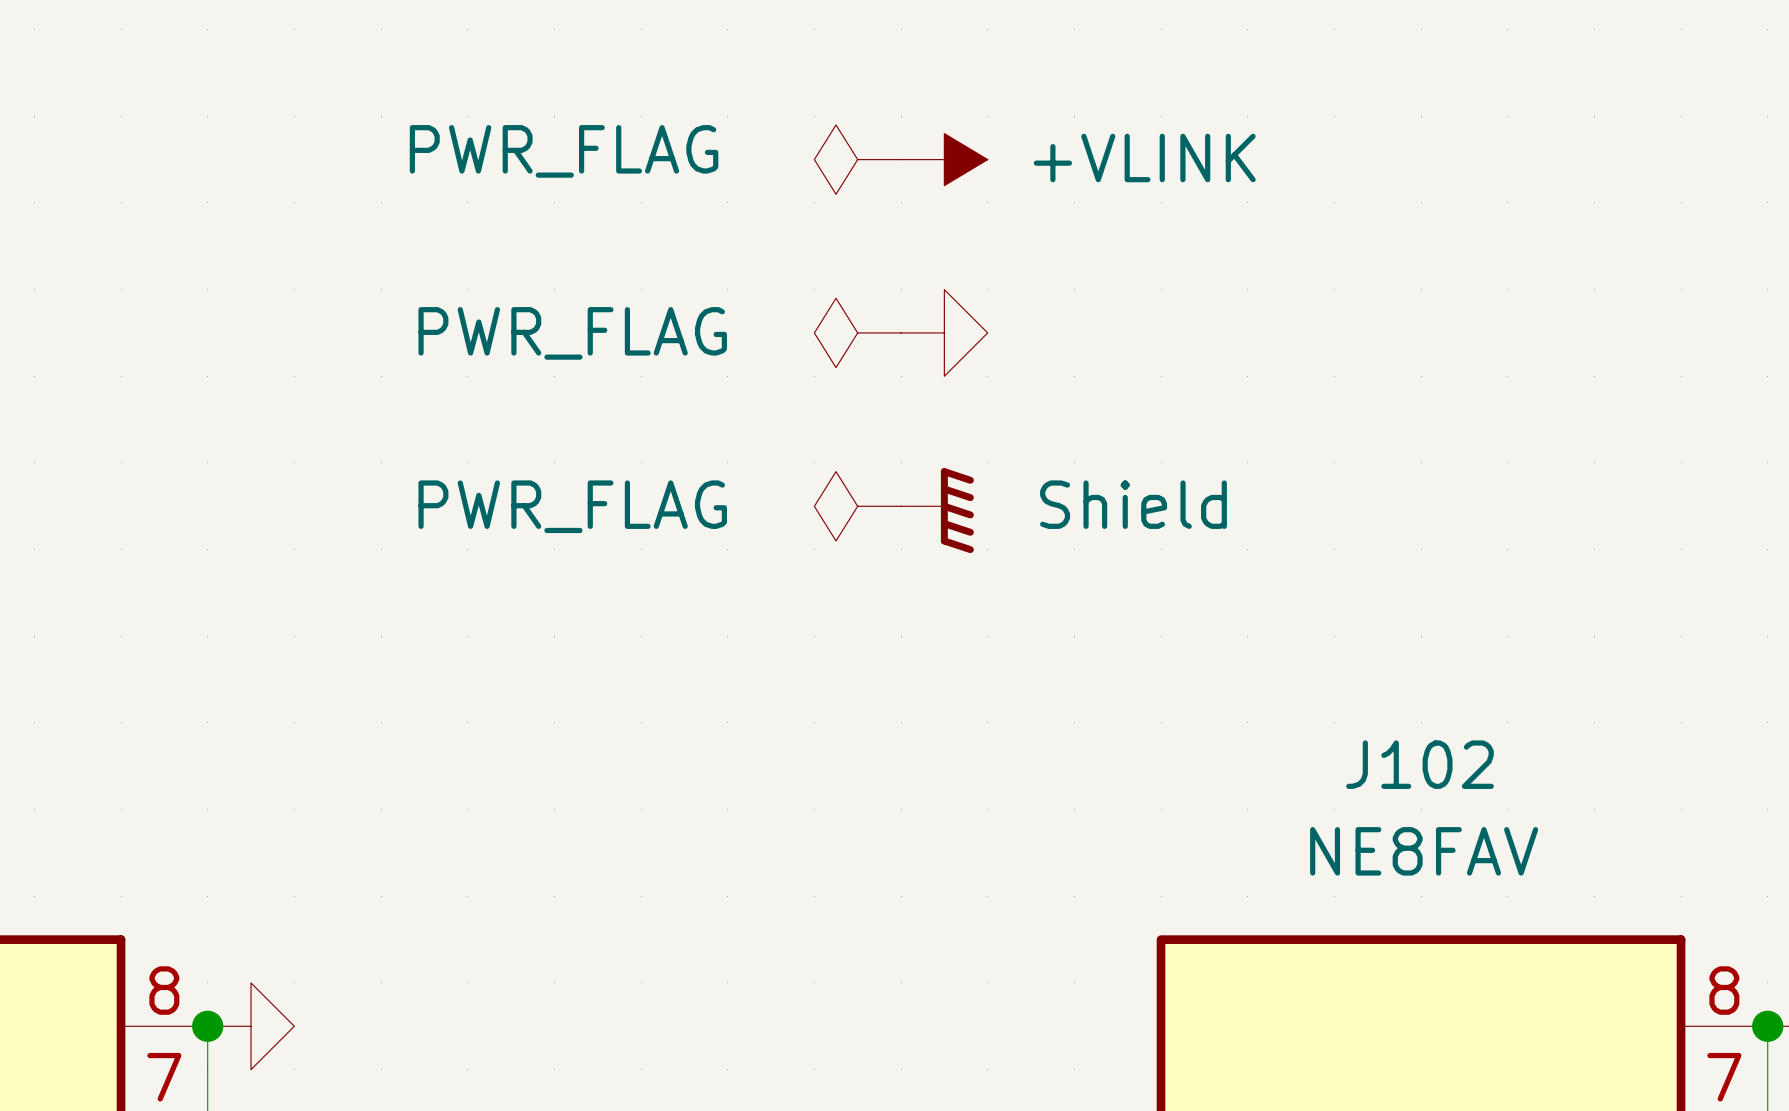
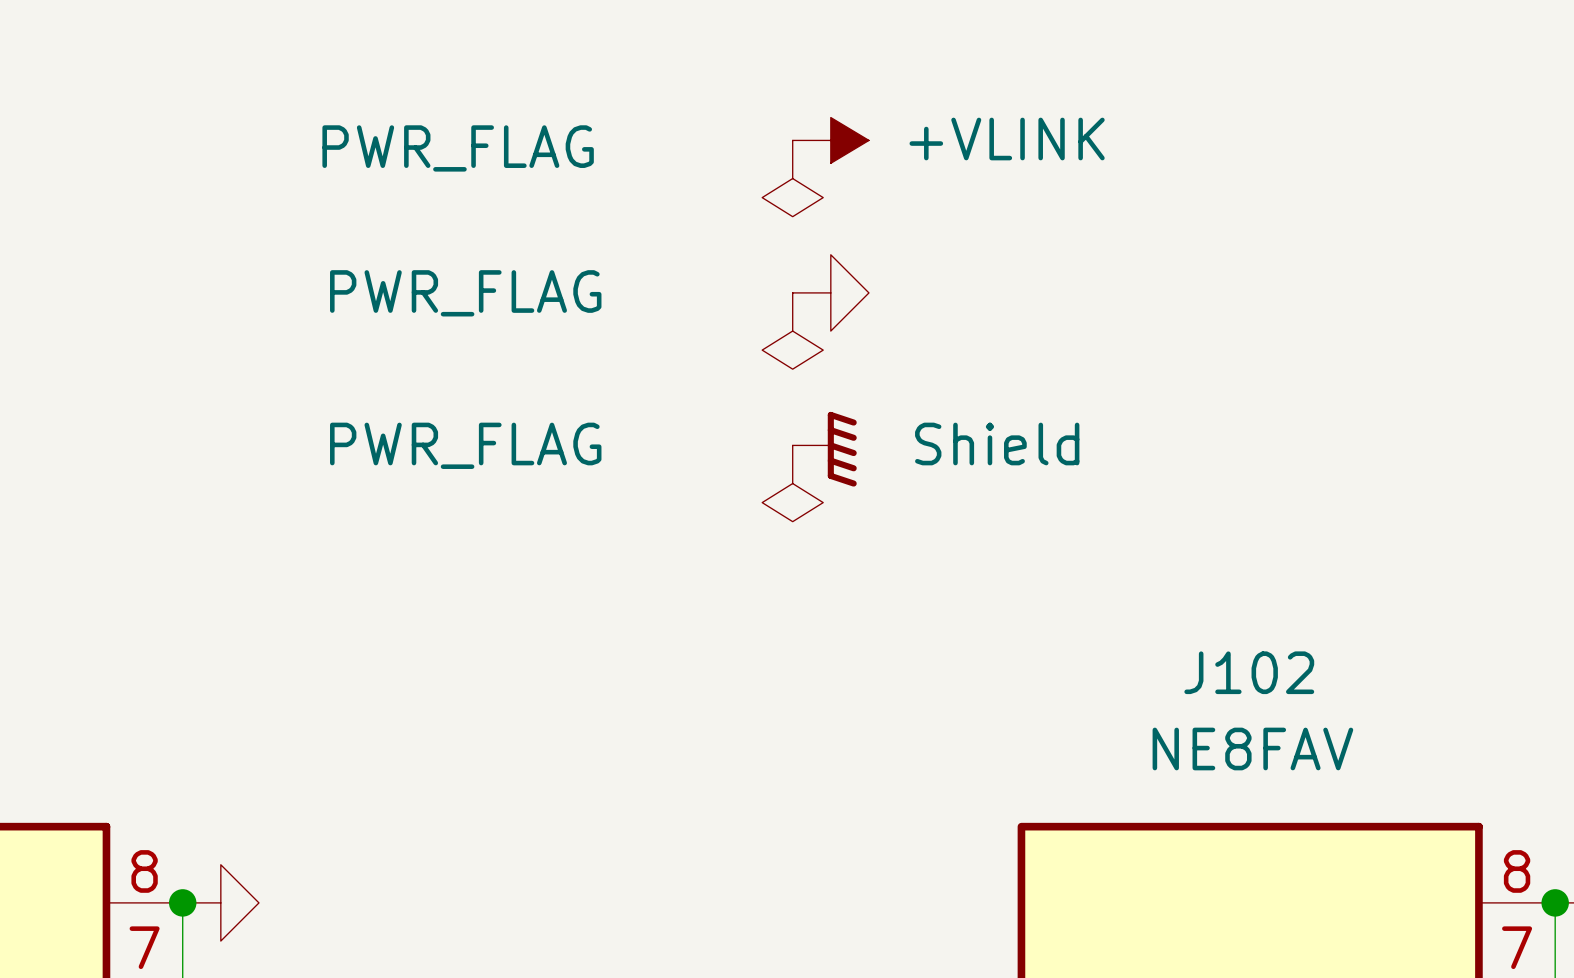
power symbol text position: PWR_FLAG (564, 151) -> PWR_FLAG (458, 148)
power symbol rotation: 0° (857, 159) -> 90° counterclockwise (792, 178)
power symbol position: PWR_FLAG (857, 159) -> PWR_FLAG (792, 178)
power symbol rotation: 0° (857, 332) -> 90° counterclockwise (792, 331)
power symbol position: PWR_FLAG (857, 332) -> PWR_FLAG (792, 331)
power symbol text position: PWR_FLAG (572, 333) -> PWR_FLAG (465, 293)
power symbol text position: PWR_FLAG (572, 506) -> PWR_FLAG (465, 445)
power symbol rotation: 0° (857, 506) -> 90° counterclockwise (792, 483)
power symbol position: PWR_FLAG (857, 506) -> PWR_FLAG (792, 483)

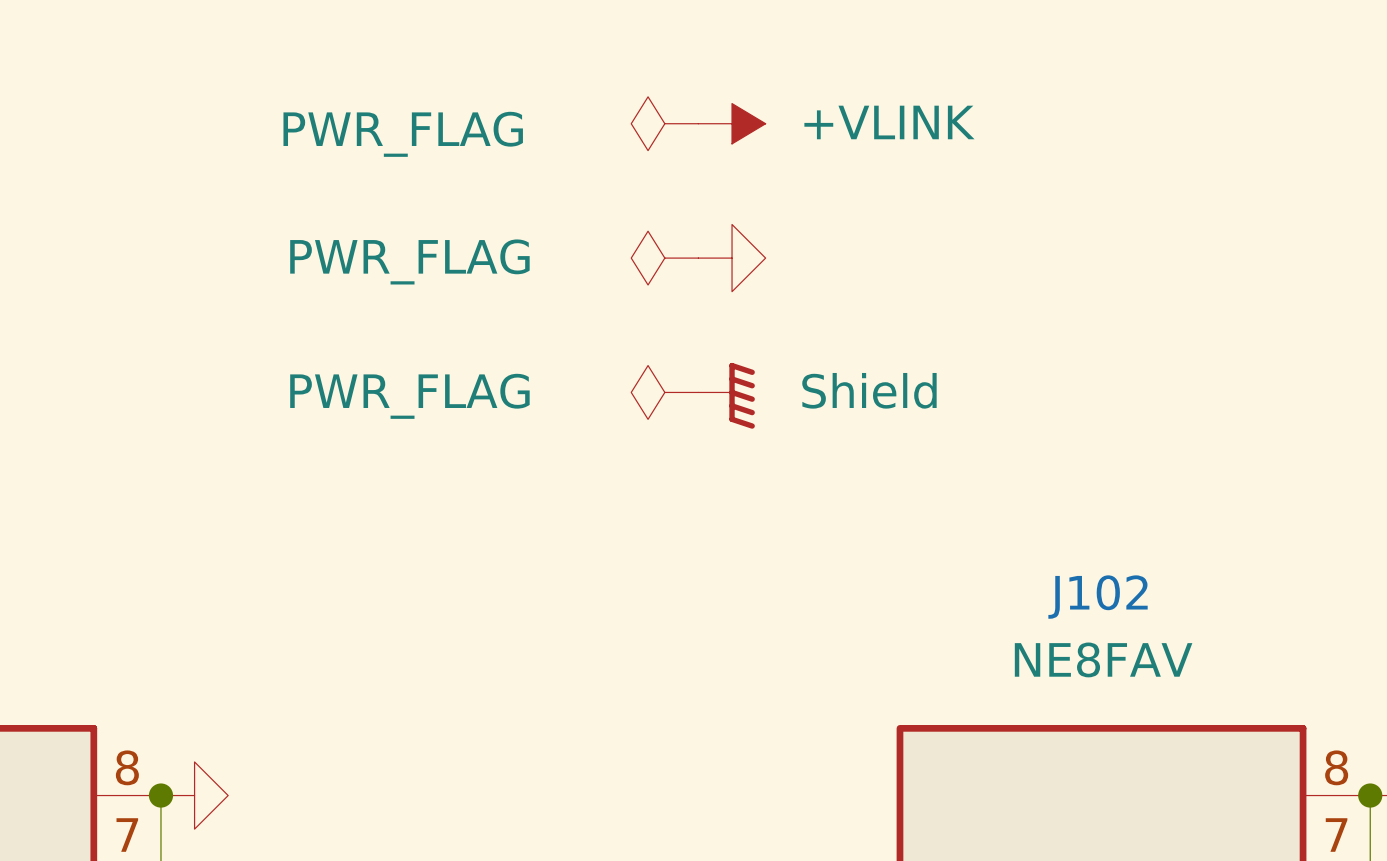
power symbol rotation: 0° (792, 178) -> 90° clockwise (664, 123)
power symbol position: PWR_FLAG (792, 178) -> PWR_FLAG (664, 123)
power symbol rotation: 0° (792, 331) -> 90° clockwise (664, 258)
power symbol position: PWR_FLAG (792, 331) -> PWR_FLAG (664, 258)
power symbol rotation: 0° (792, 483) -> 90° clockwise (664, 392)
power symbol position: PWR_FLAG (792, 483) -> PWR_FLAG (664, 392)

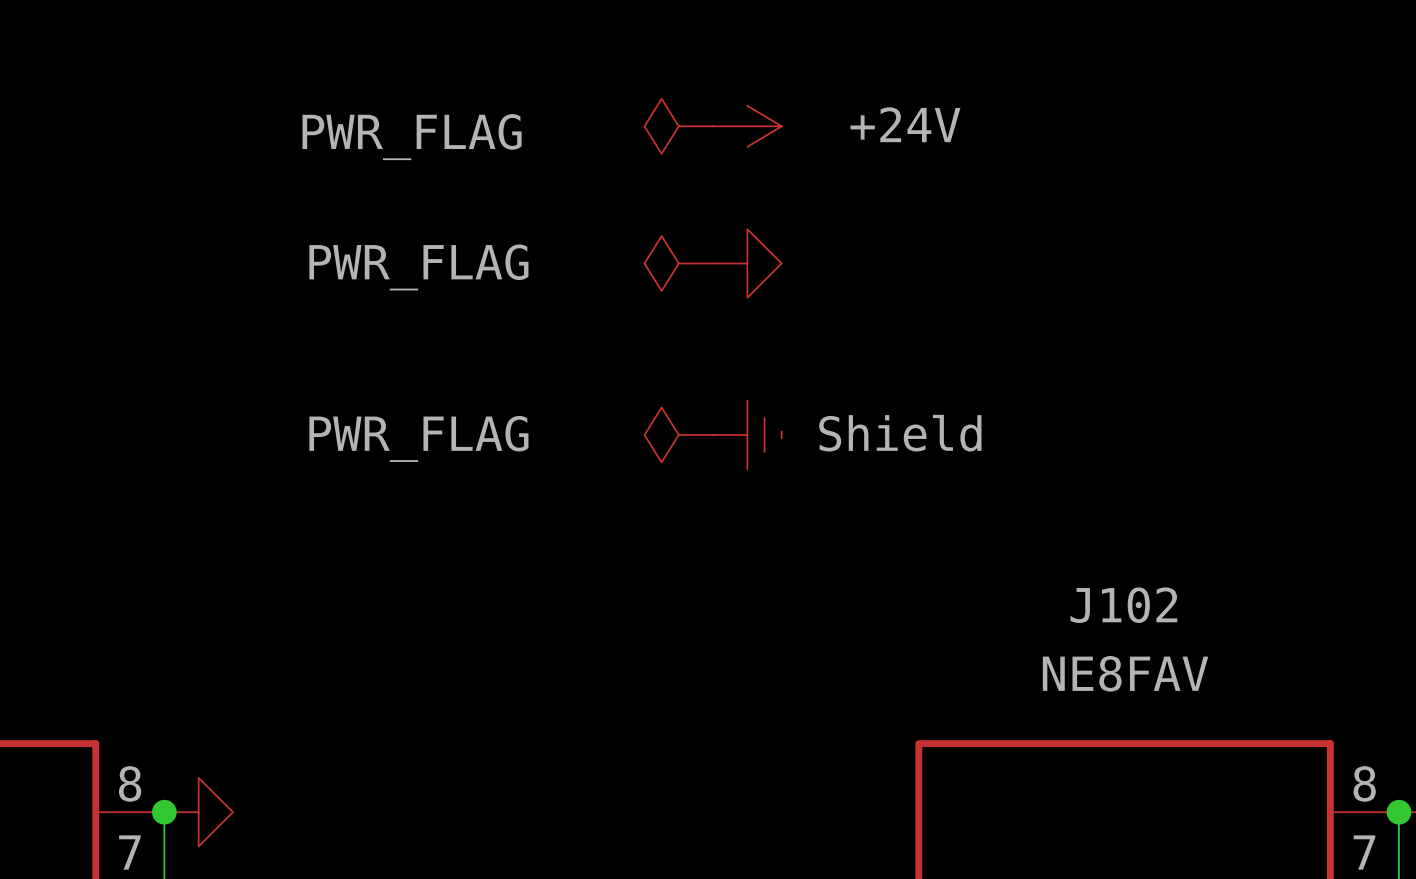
power symbol: +VLINK (732, 123) -> +24V (747, 126)
power symbol position: PWR_FLAG (664, 392) -> PWR_FLAG (678, 434)
power symbol: Shield (726, 395) -> none
power symbol: none -> Shield (747, 434)

